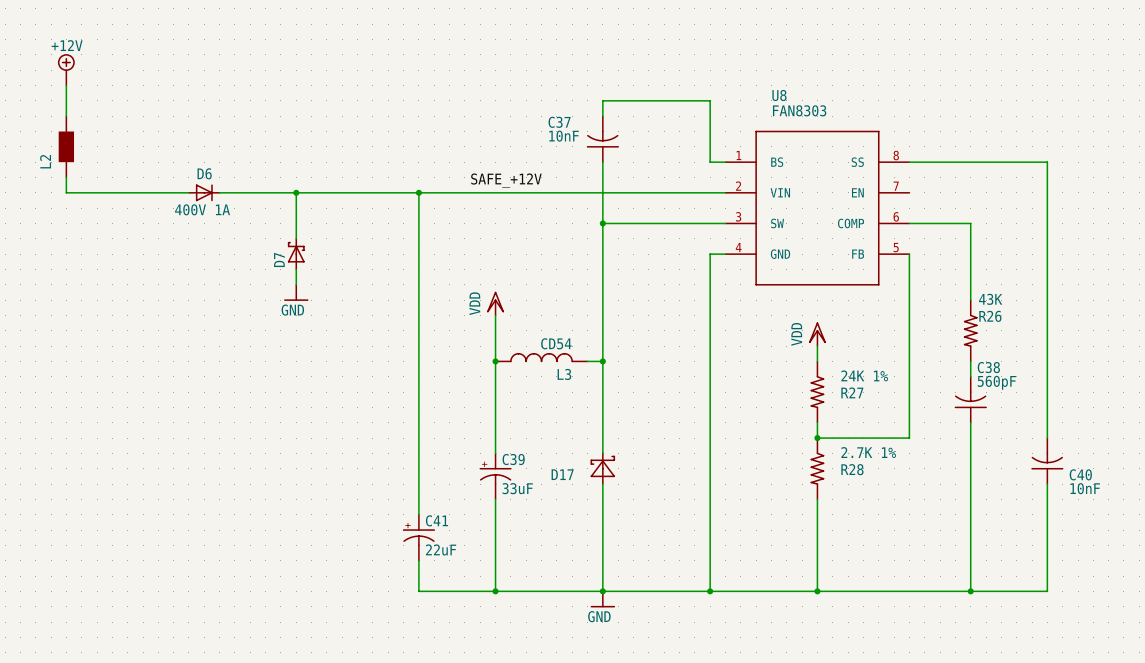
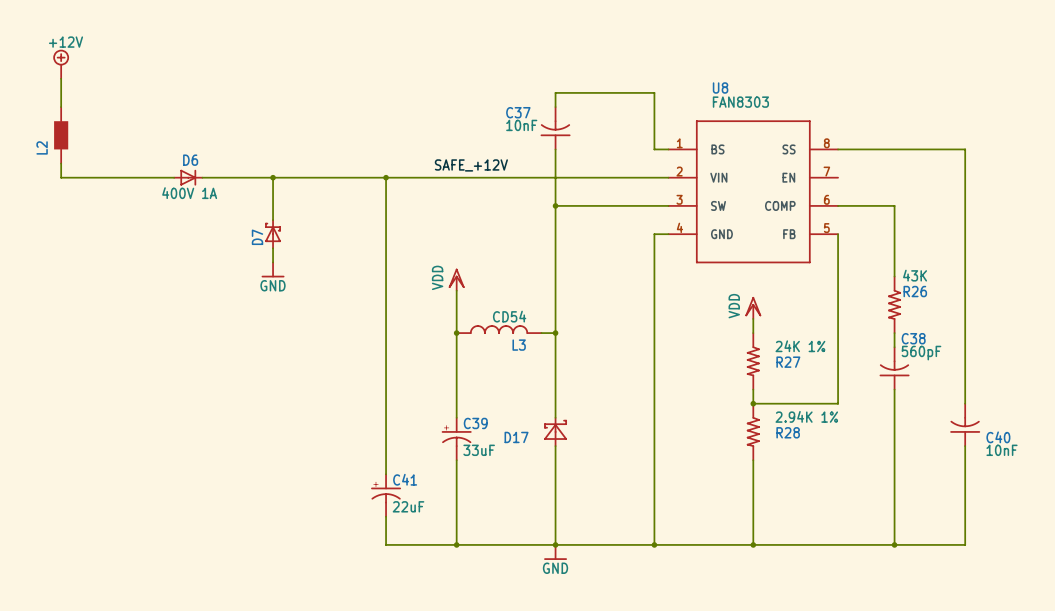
R28 value: 2.7K 1% (868, 452) -> 2.94K 1% (806, 416)

